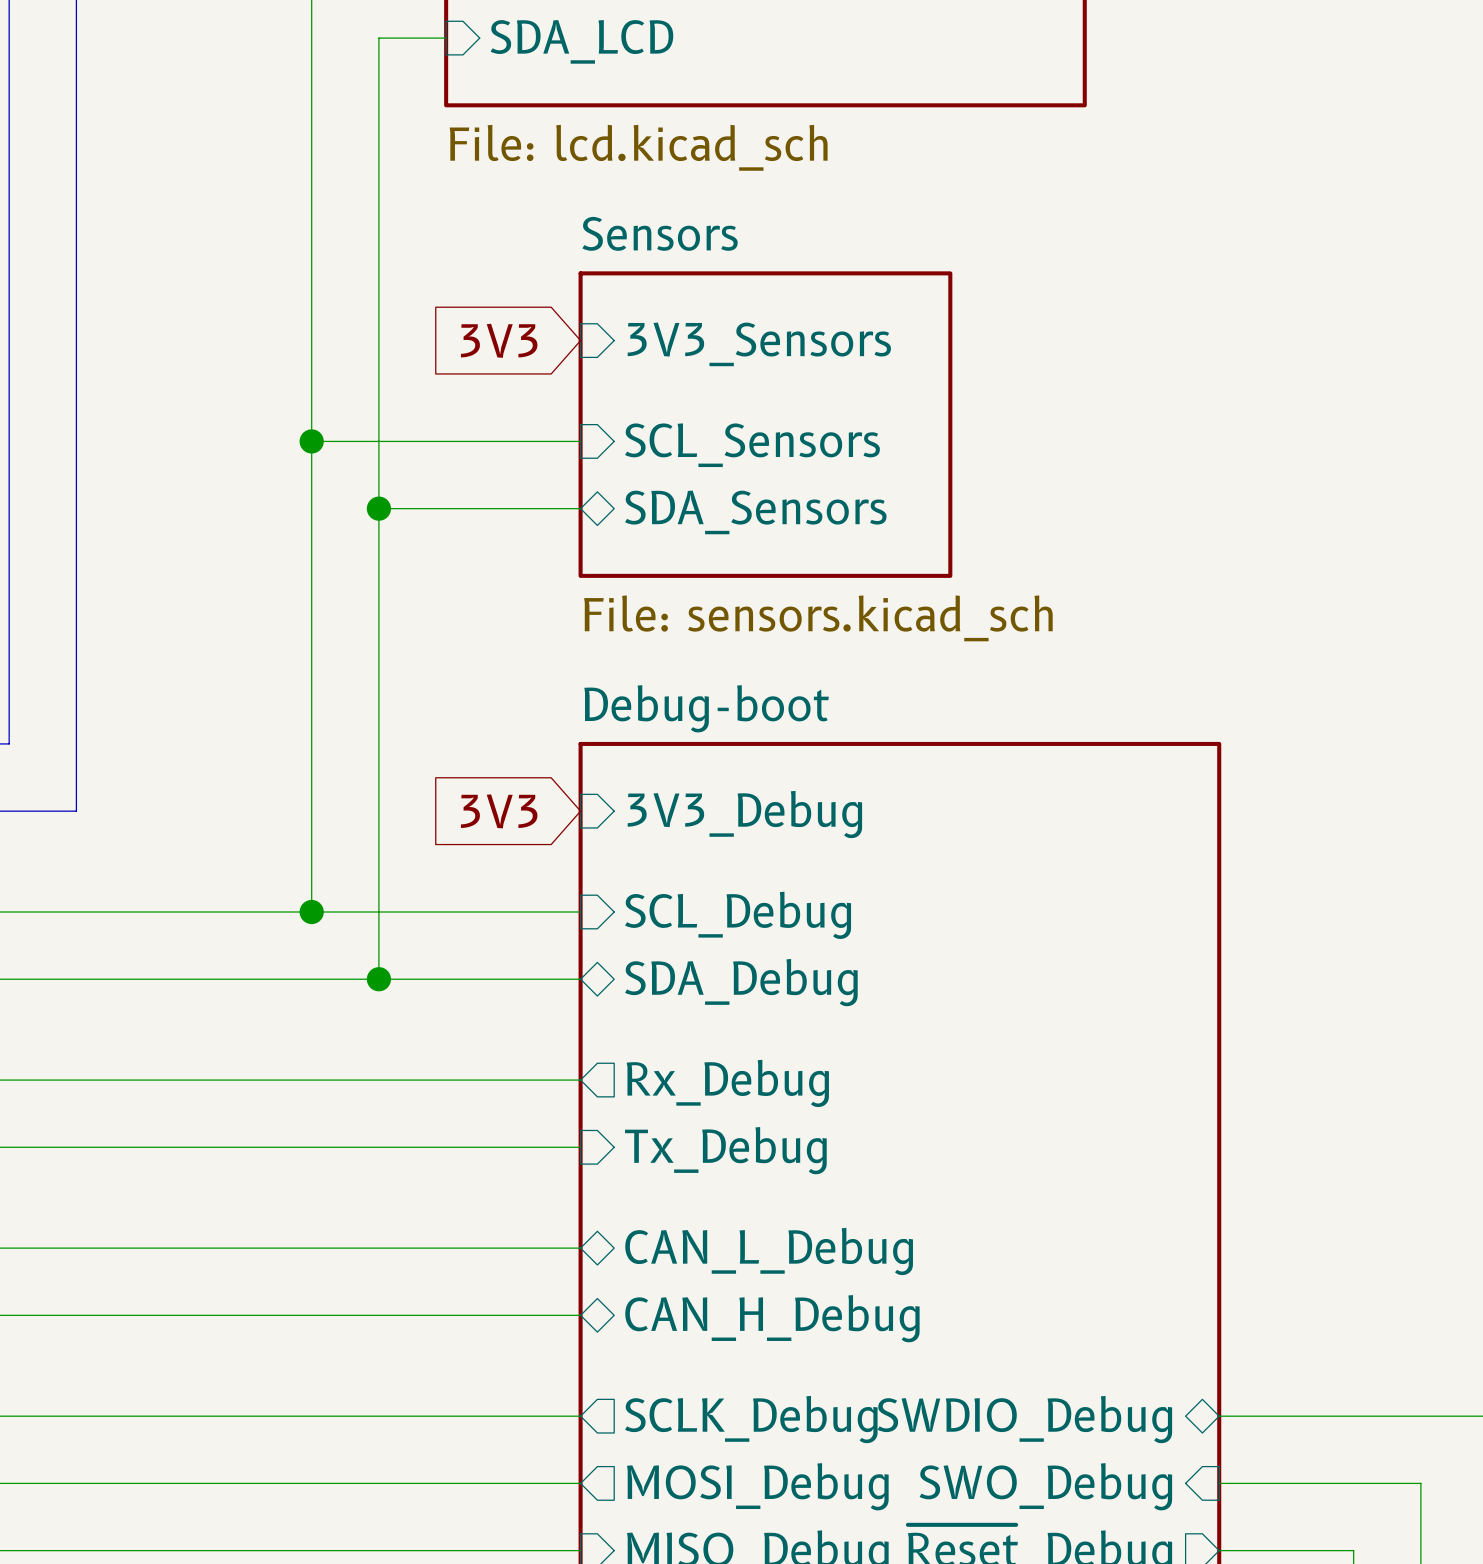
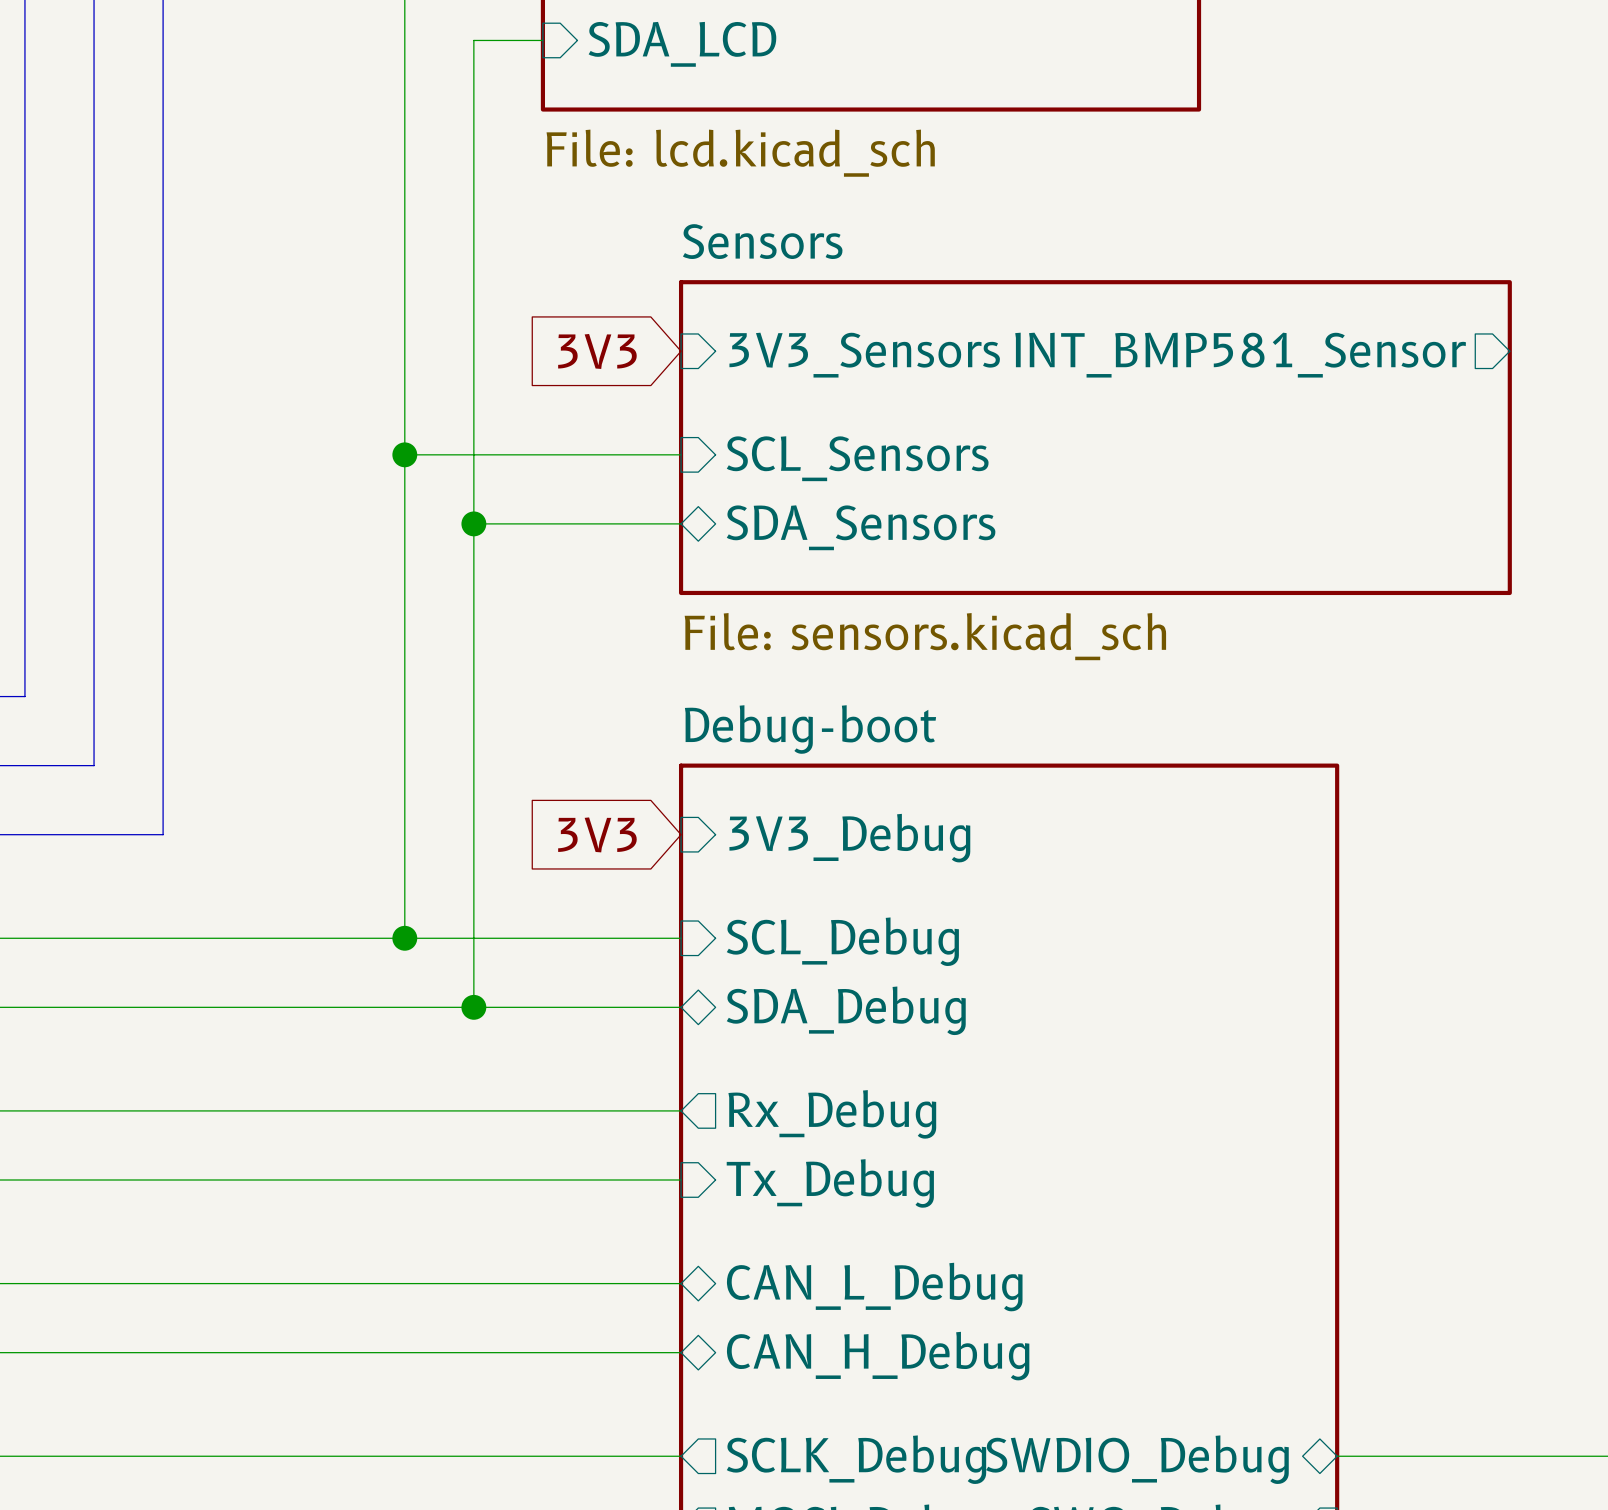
sheet pin: none -> INT_BMP581_Sensor (1240, 355)
sheet Sensors: File: sensors.kicad_sch (765, 424) -> none
sheet Sensors: none -> File: sensors.kicad_sch (1095, 437)

